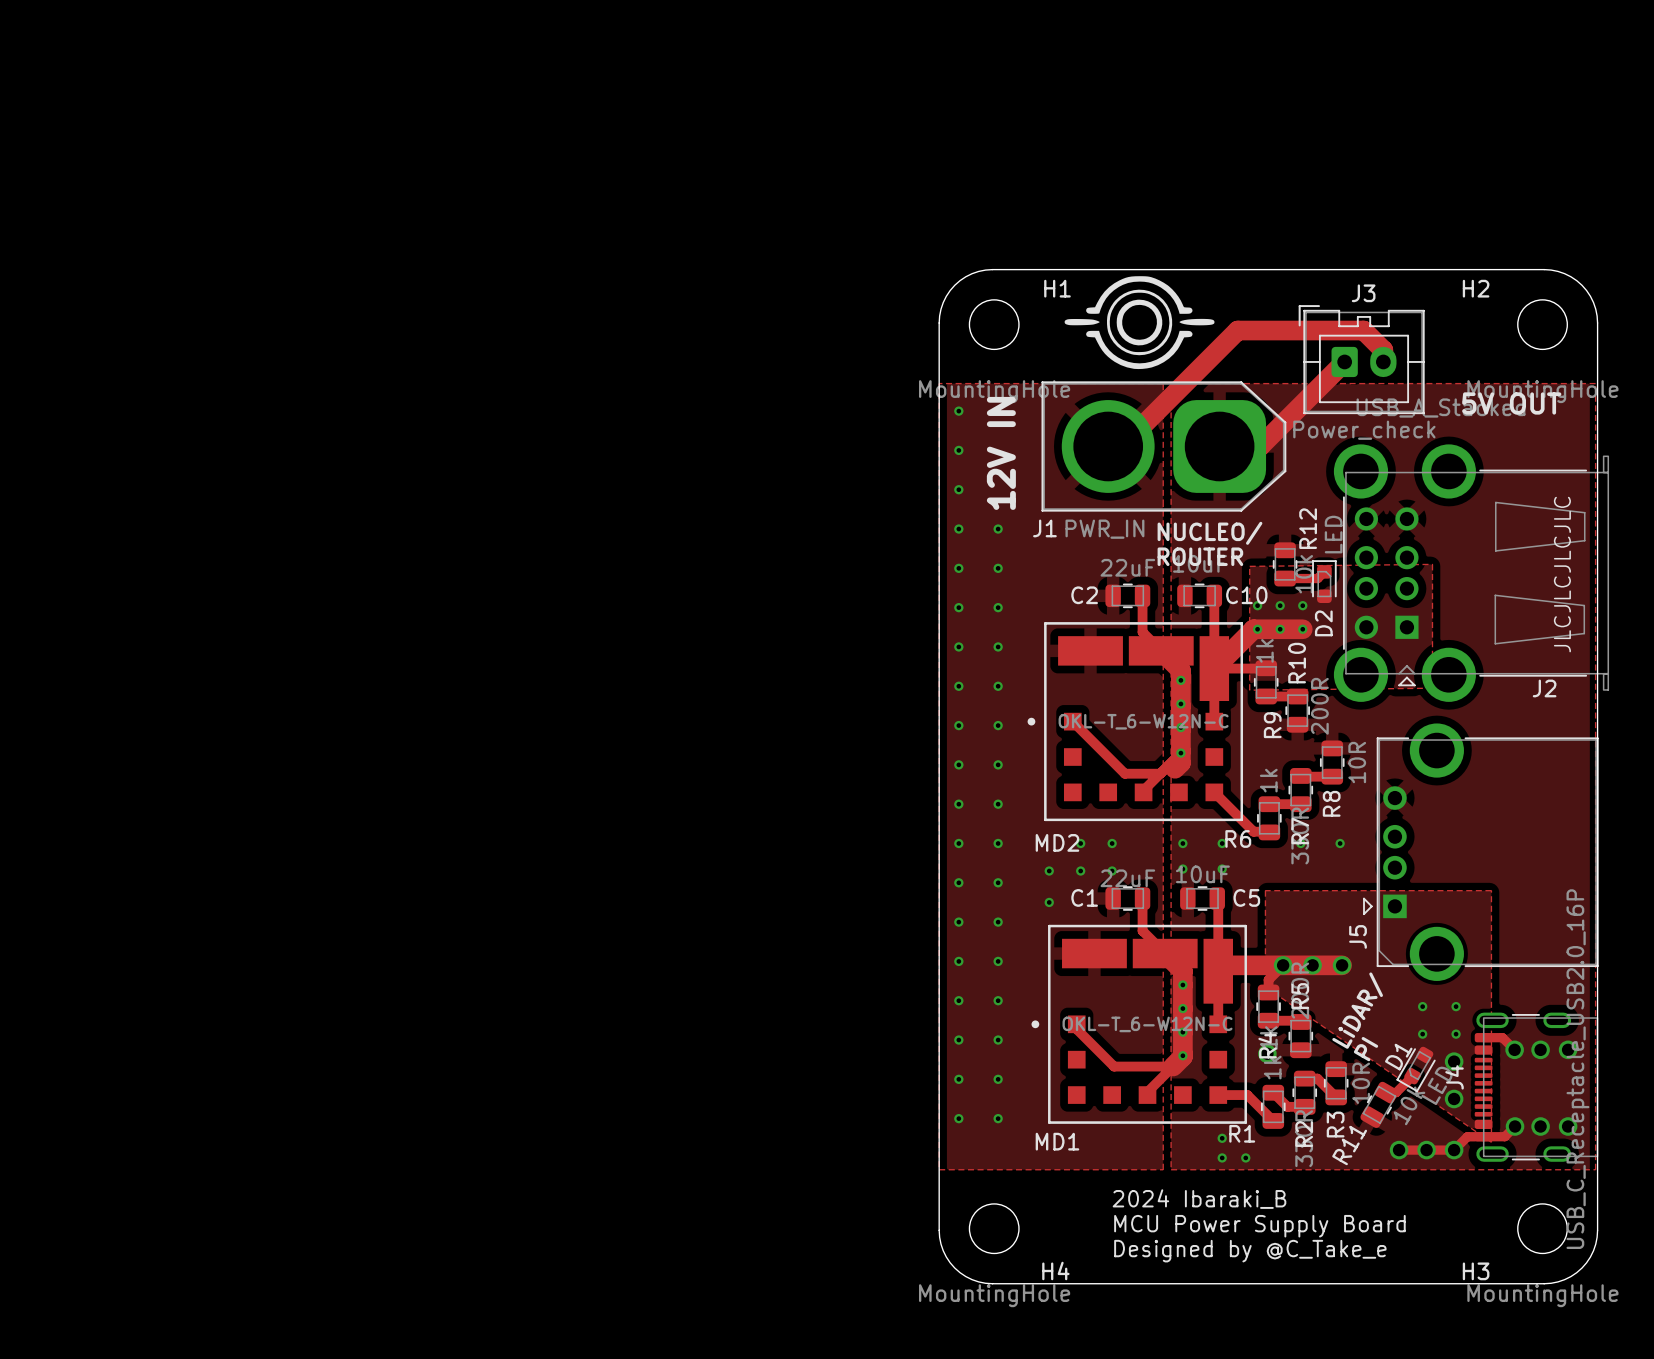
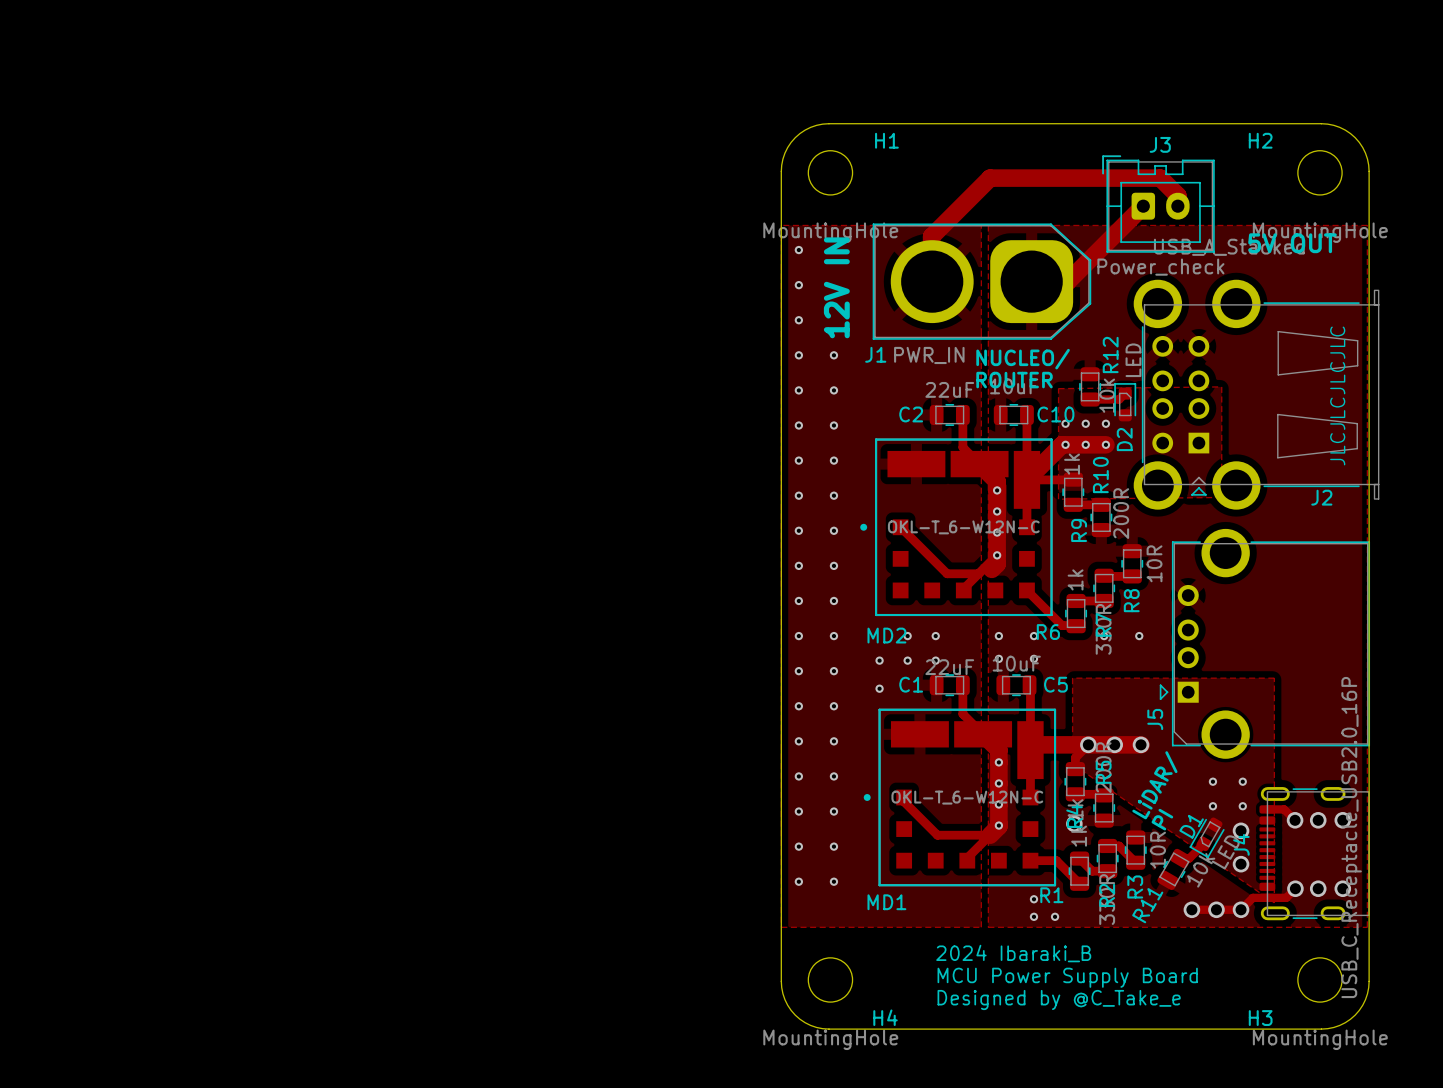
drawing: [1064, 276, 1215, 370] -> none
track: (1237, 330) (1121, 446) (1107, 446) -> (1047, 178) (990, 178) (931, 236) (931, 281)

